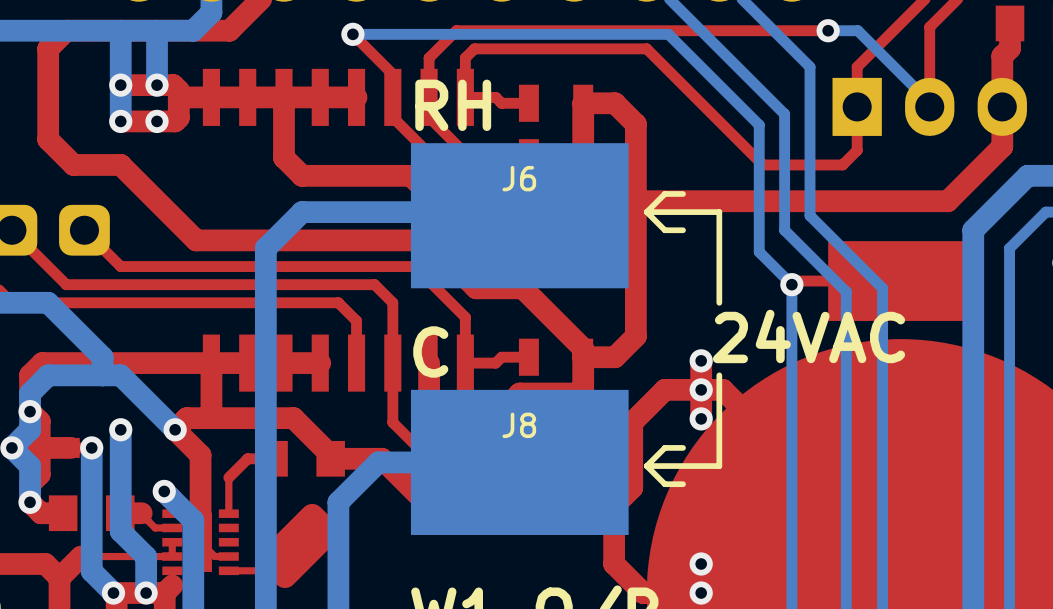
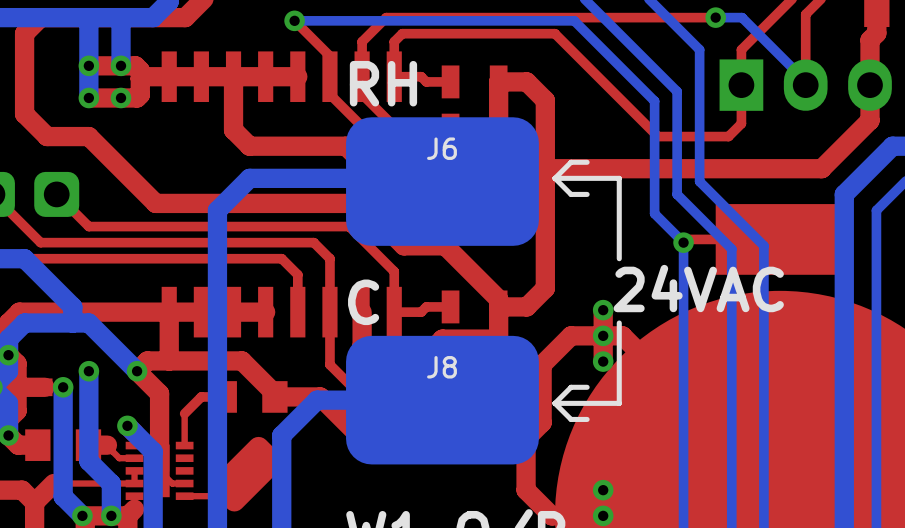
J6 footprint: [410, 143, 629, 289] -> [346, 117, 539, 246]
J8 footprint: [410, 389, 629, 535] -> [346, 335, 539, 465]

